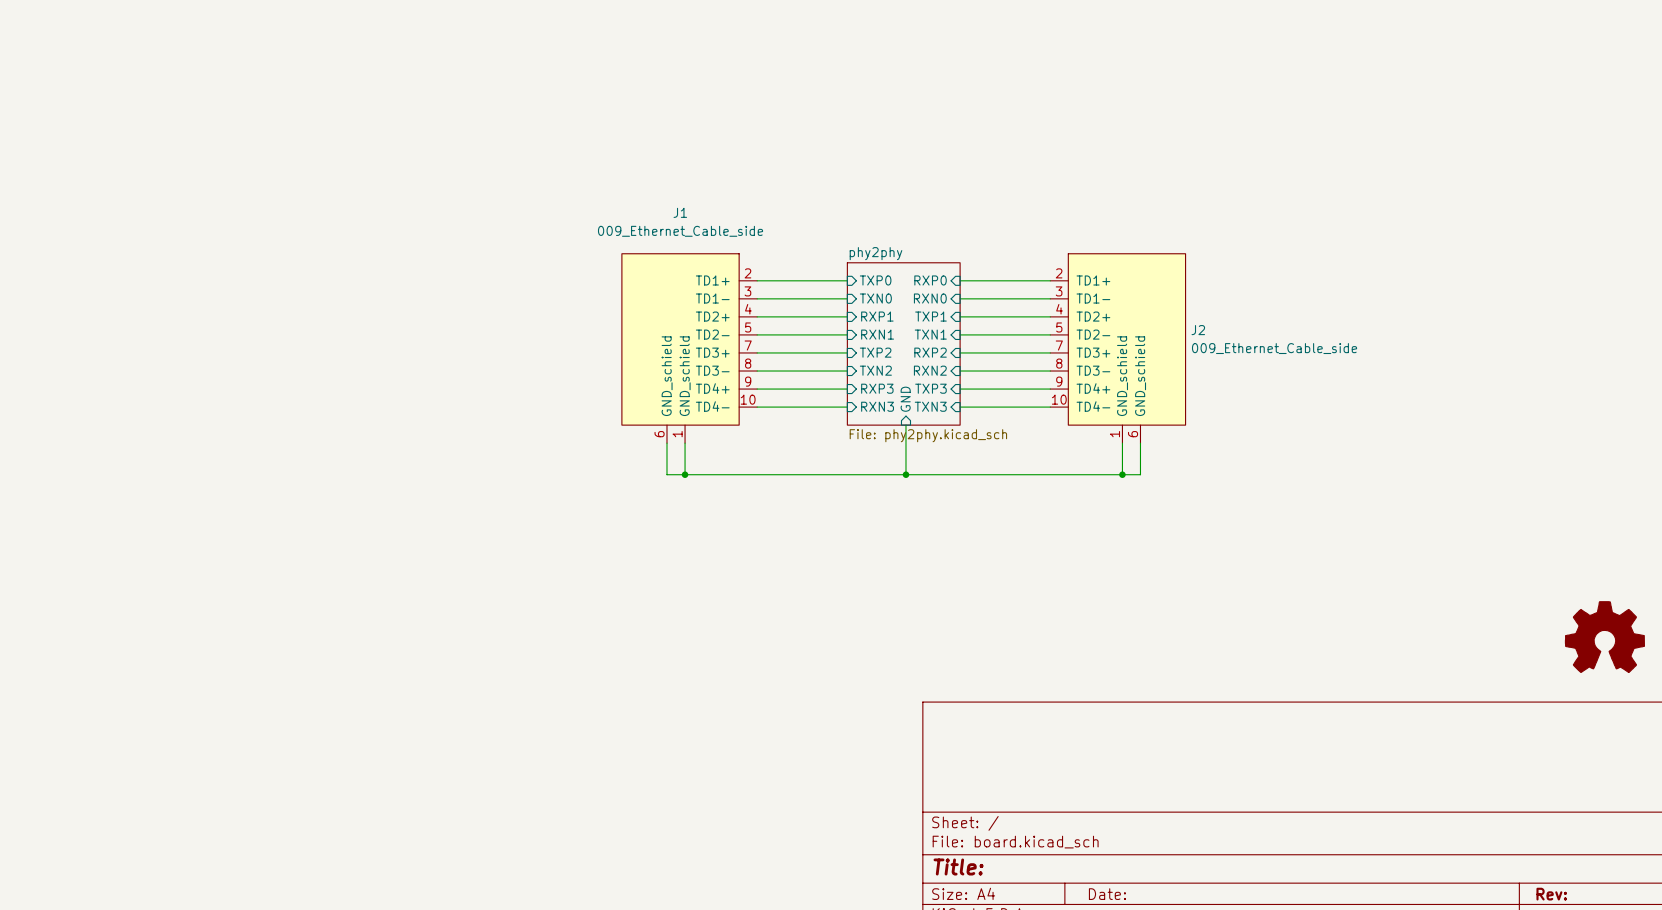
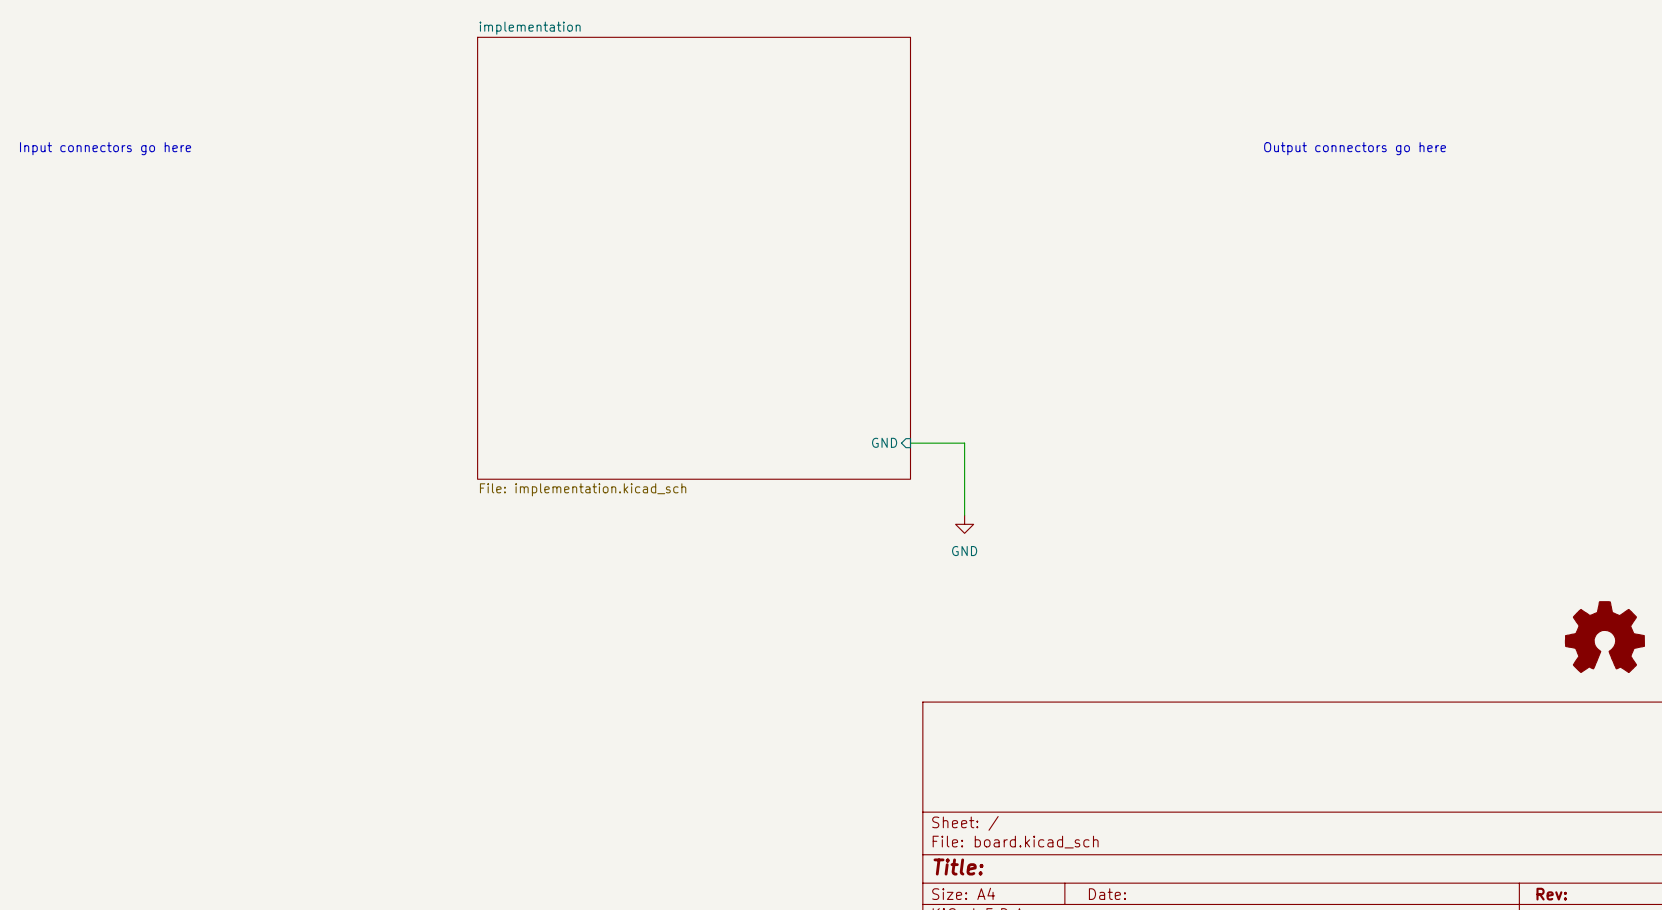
text: none -> Input connectors go here (105, 148)
text: none -> Output connectors go here (1355, 148)
sheet implementation: none -> File: implementation.kicad_sch (694, 258)
wire: (757, 280) (847, 280) -> none
sheet pin: TXP0 (875, 280) -> none
sheet pin: RXP0 (930, 280) -> none
wire: (960, 280) (1050, 280) -> none
wire: (757, 298) (847, 298) -> none
sheet pin: TXN0 (875, 298) -> none
sheet pin: RXN0 (930, 298) -> none
wire: (960, 298) (1050, 298) -> none
wire: (757, 316) (847, 316) -> none
sheet pin: RXP1 (877, 316) -> none
sheet pin: TXP1 (930, 316) -> none
wire: (960, 316) (1050, 316) -> none
wire: (757, 334) (847, 334) -> none
sheet pin: RXN1 (877, 334) -> none
sheet pin: TXN1 (930, 334) -> none
wire: (960, 334) (1050, 334) -> none
sheet phy2phy: File: phy2phy.kicad_sch (903, 343) -> none
J1: 009_Ethernet_Cable_side (689, 348) -> none
J2: 009_Ethernet_Cable_side (1117, 348) -> none
wire: (757, 352) (847, 352) -> none
sheet pin: TXP2 (875, 352) -> none
sheet pin: RXP2 (930, 352) -> none
wire: (960, 352) (1050, 352) -> none
sheet pin: TXN2 (875, 370) -> none
sheet pin: RXN2 (930, 370) -> none
wire: (757, 371) (847, 371) -> none
wire: (960, 371) (1050, 371) -> none
sheet pin: RXP3 (877, 388) -> none
sheet pin: TXP3 (930, 388) -> none
wire: (757, 389) (847, 389) -> none
wire: (960, 389) (1050, 389) -> none
sheet pin rotation: 0° (905, 399) -> 90° counterclockwise (884, 442)
sheet pin position: GND (905, 399) -> GND (884, 442)
sheet pin: RXN3 (877, 406) -> none
sheet pin: TXN3 (930, 406) -> none
wire: (757, 407) (847, 407) -> none
wire: (960, 407) (1050, 407) -> none
wire: (905, 425) (905, 474) -> none
wire: (666, 443) (666, 474) (1140, 474) (1140, 443) -> none
wire: (685, 443) (685, 474) -> none
wire: none -> (910, 443) (964, 443) (964, 515)
wire: (1122, 443) (1122, 474) -> none
junction: (685, 474) -> none
junction: (905, 474) -> none
junction: (1122, 474) -> none
power symbol: none -> GND (964, 524)

